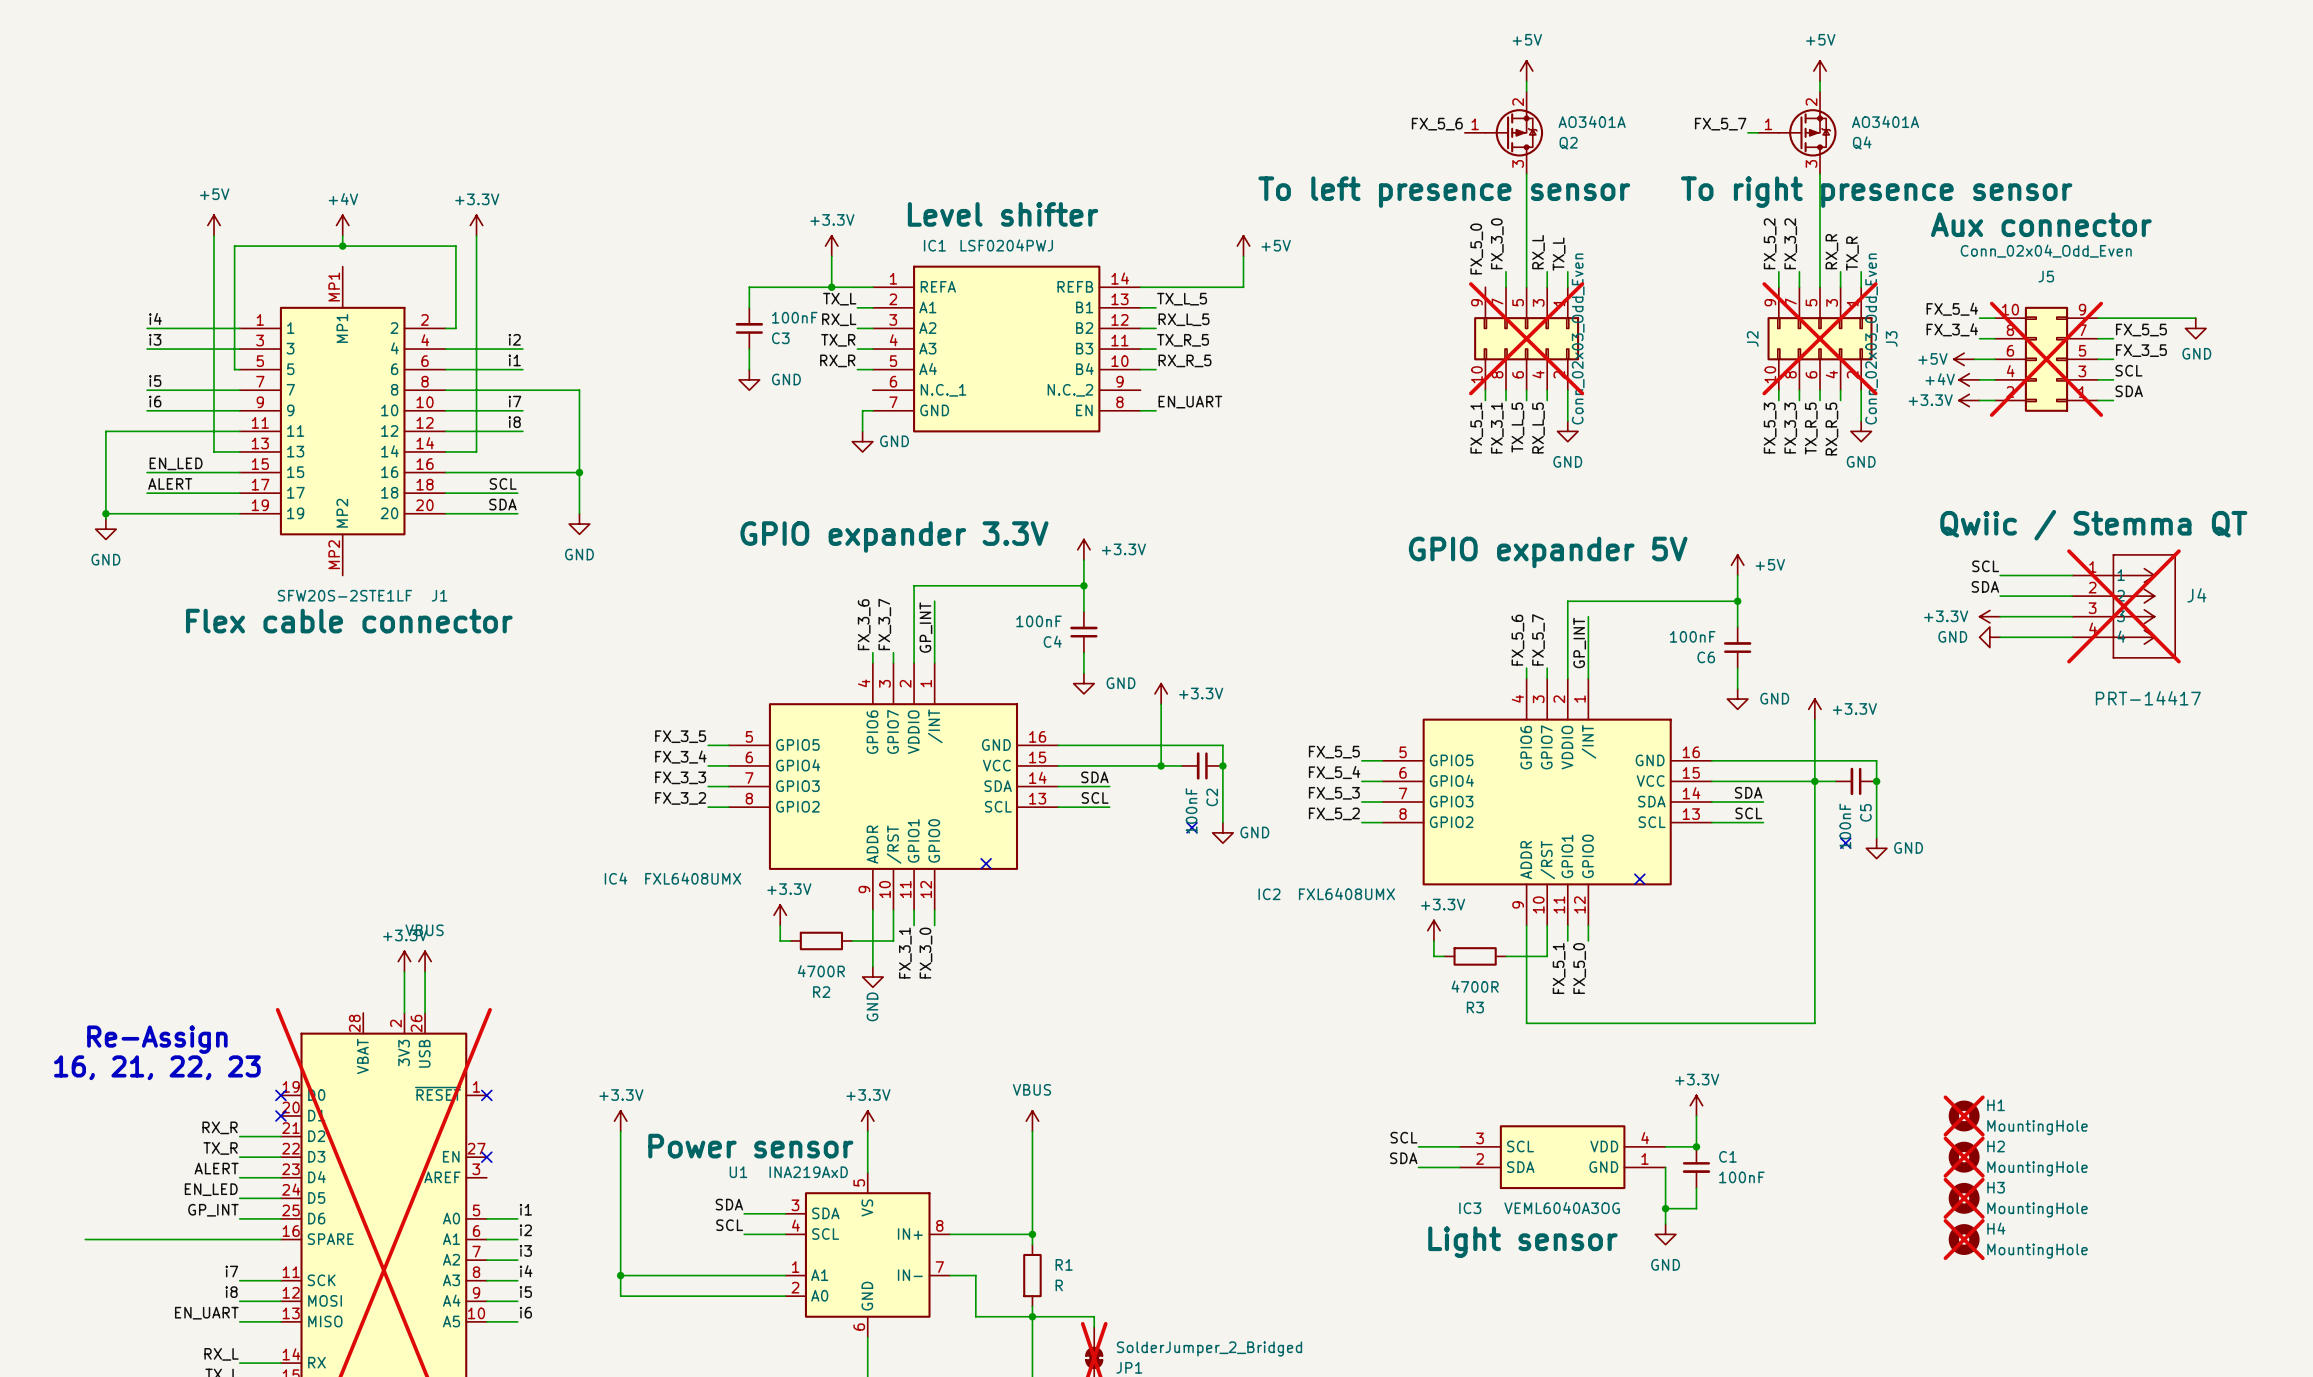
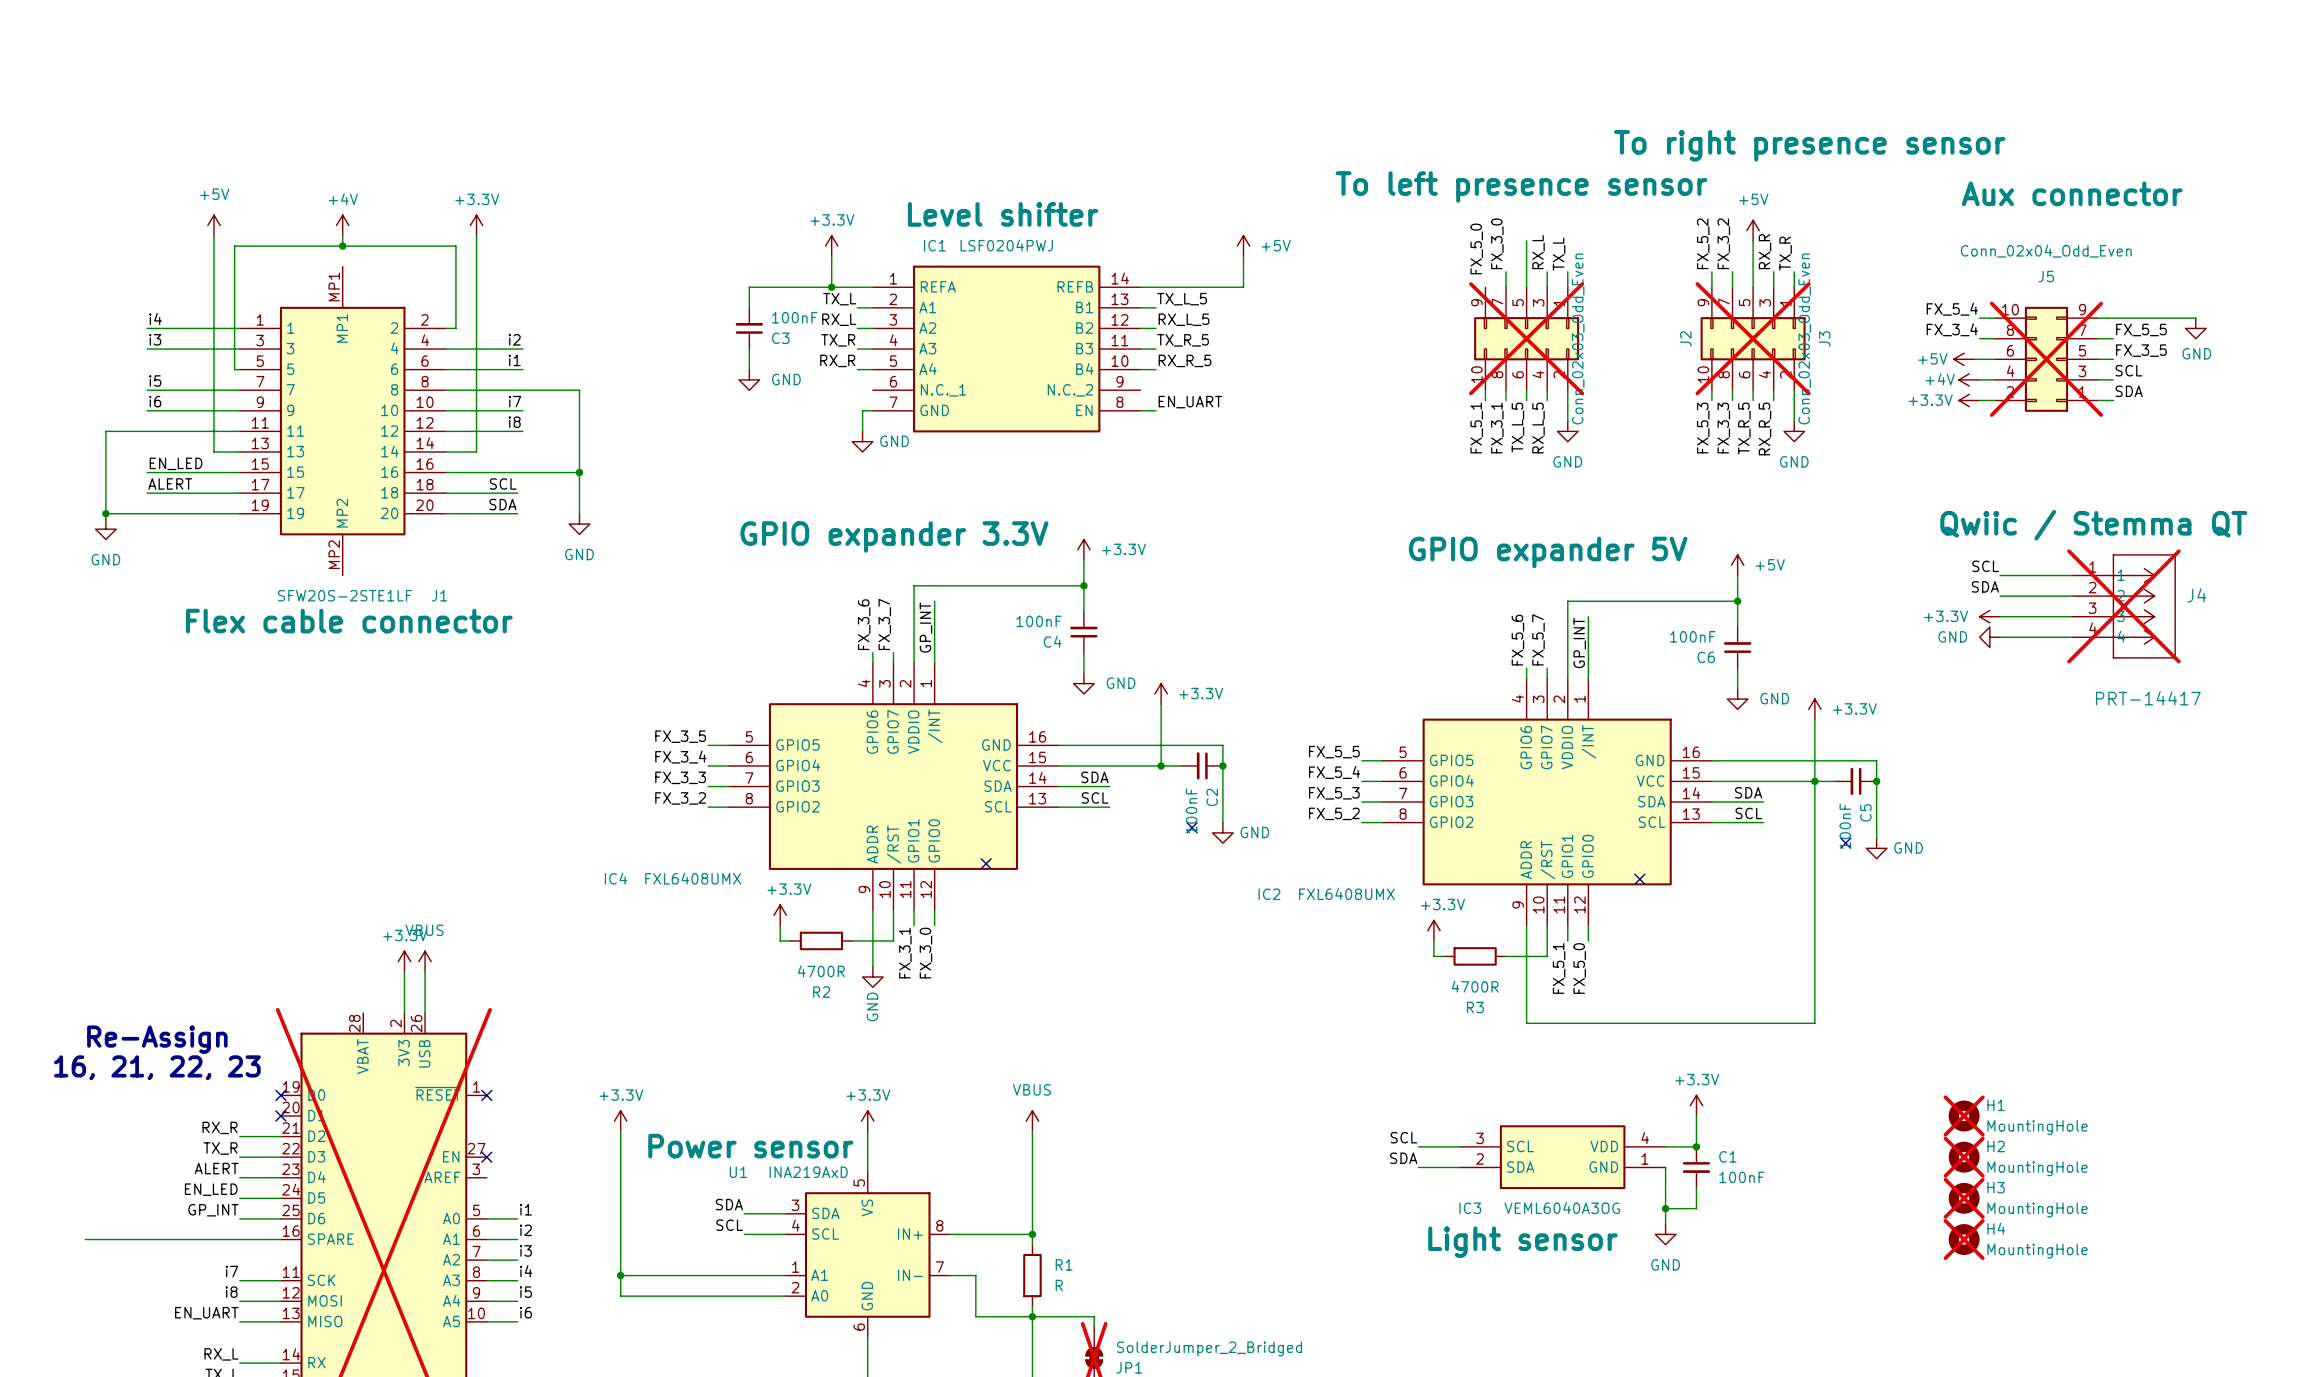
power symbol: +5V (1526, 71) -> none
power symbol: +5V (1820, 71) -> none
wire: (1526, 81) (1526, 91) -> none
wire: (1820, 81) (1820, 91) -> none
label: FX_5_6 (1437, 124) -> none
label: FX_5_7 (1720, 124) -> none
Q2: AO3401A (1503, 132) -> none
wire: (1747, 132) (1758, 132) -> none
Q4: AO3401A (1797, 132) -> none
wire: (1526, 174) (1526, 240) -> none
wire: (1820, 174) (1820, 287) -> none
J2 text position: To left presence sensor (1444, 192) -> To left presence sensor (1521, 186)
J3 text position: To right presence sensor (1876, 192) -> To right presence sensor (1809, 145)
J5 text position: Aux connector (2041, 224) -> Aux connector (2072, 193)
power symbol: none -> +5V (1753, 230)
wire: none -> (1753, 240) (1753, 287)
label position: FX_5_2 (1770, 243) -> FX_5_2 (1703, 243)
label position: FX_3_2 (1790, 243) -> FX_3_2 (1723, 243)
label position: RX_R (1831, 251) -> RX_R (1764, 251)
label position: TX_R (1852, 253) -> TX_R (1785, 253)
wire: (1778, 271) (1778, 287) -> (1711, 271) (1711, 287)
wire: (1799, 271) (1799, 287) -> (1732, 271) (1732, 287)
wire: (1840, 271) (1840, 287) -> (1773, 271) (1773, 287)
wire: (1861, 271) (1861, 287) -> (1794, 271) (1794, 287)
J2 name position: J2 (1752, 338) -> J2 (1685, 338)
J3 position: (1820, 338) -> (1753, 338)
wire: (1778, 390) (1778, 400) -> (1711, 390) (1711, 400)
wire: (1799, 390) (1799, 400) -> (1732, 390) (1732, 400)
wire: (1820, 390) (1820, 400) -> (1753, 390) (1753, 400)
wire: (1840, 390) (1840, 400) -> (1773, 390) (1773, 400)
wire: (1861, 390) (1861, 421) -> (1794, 390) (1794, 421)
label position: FX_5_3 (1770, 428) -> FX_5_3 (1703, 428)
label position: FX_3_3 (1790, 428) -> FX_3_3 (1723, 428)
label position: TX_R_5 (1811, 428) -> TX_R_5 (1744, 428)
label position: RX_R_5 (1831, 429) -> RX_R_5 (1764, 429)
power symbol position: GND (1861, 431) -> GND (1794, 431)

